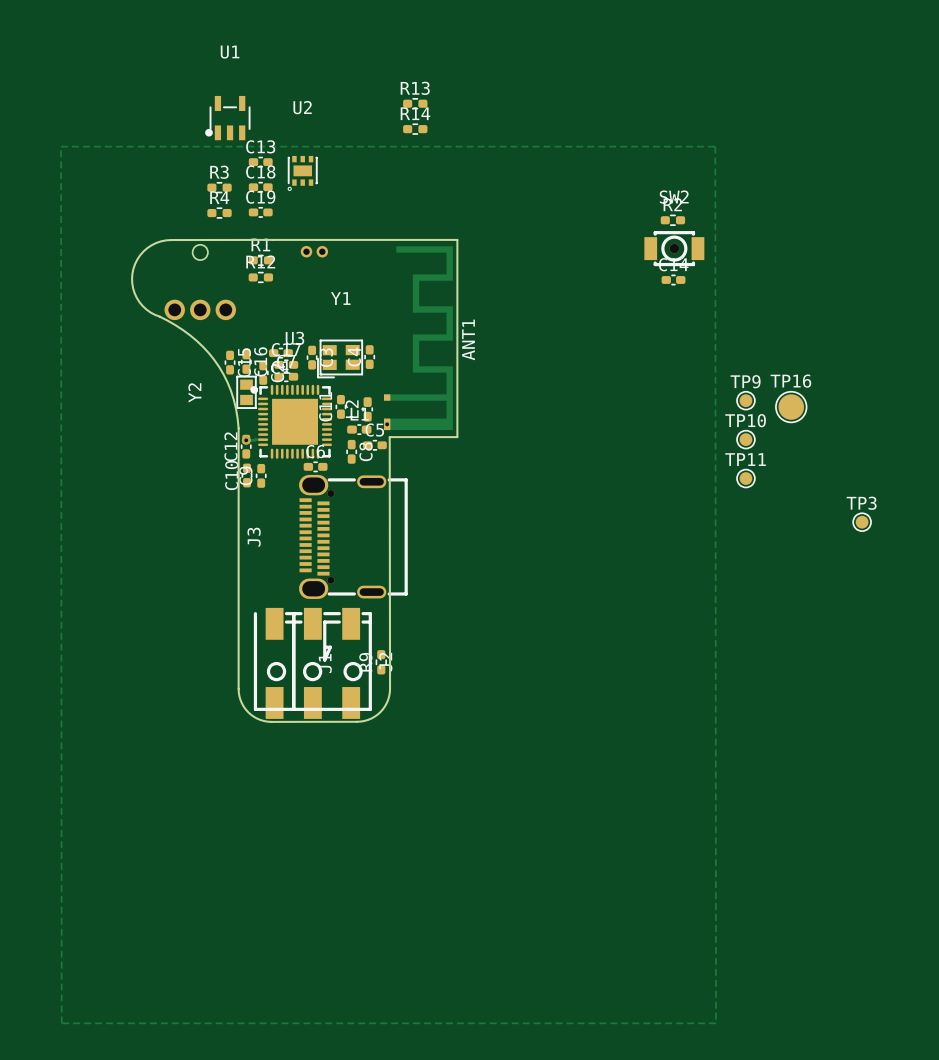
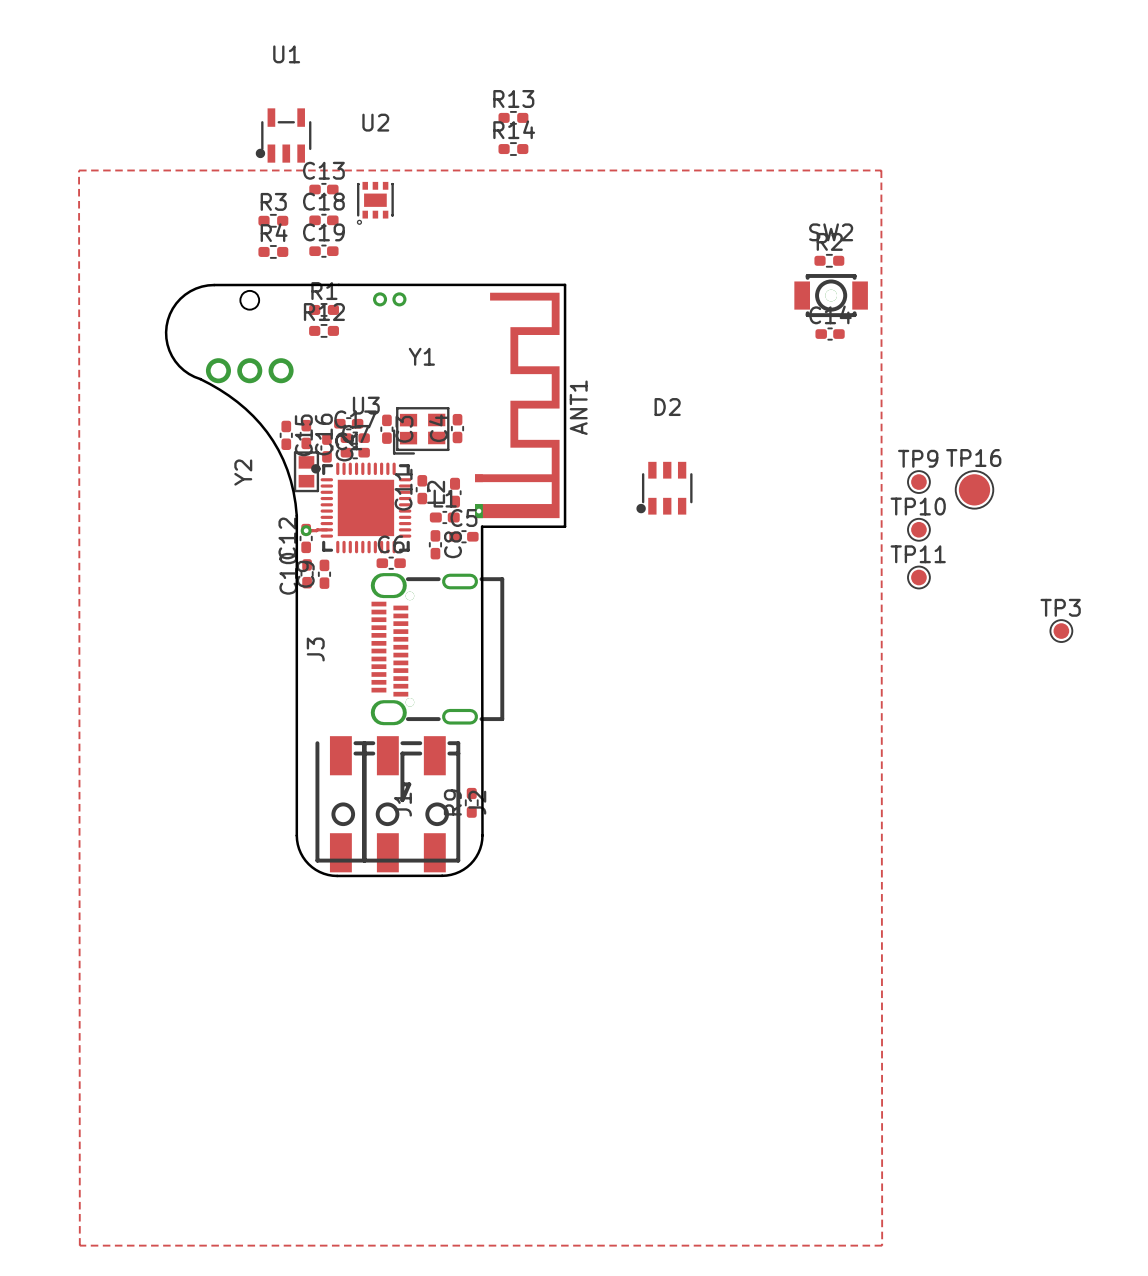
D2: none -> (664, 488)

